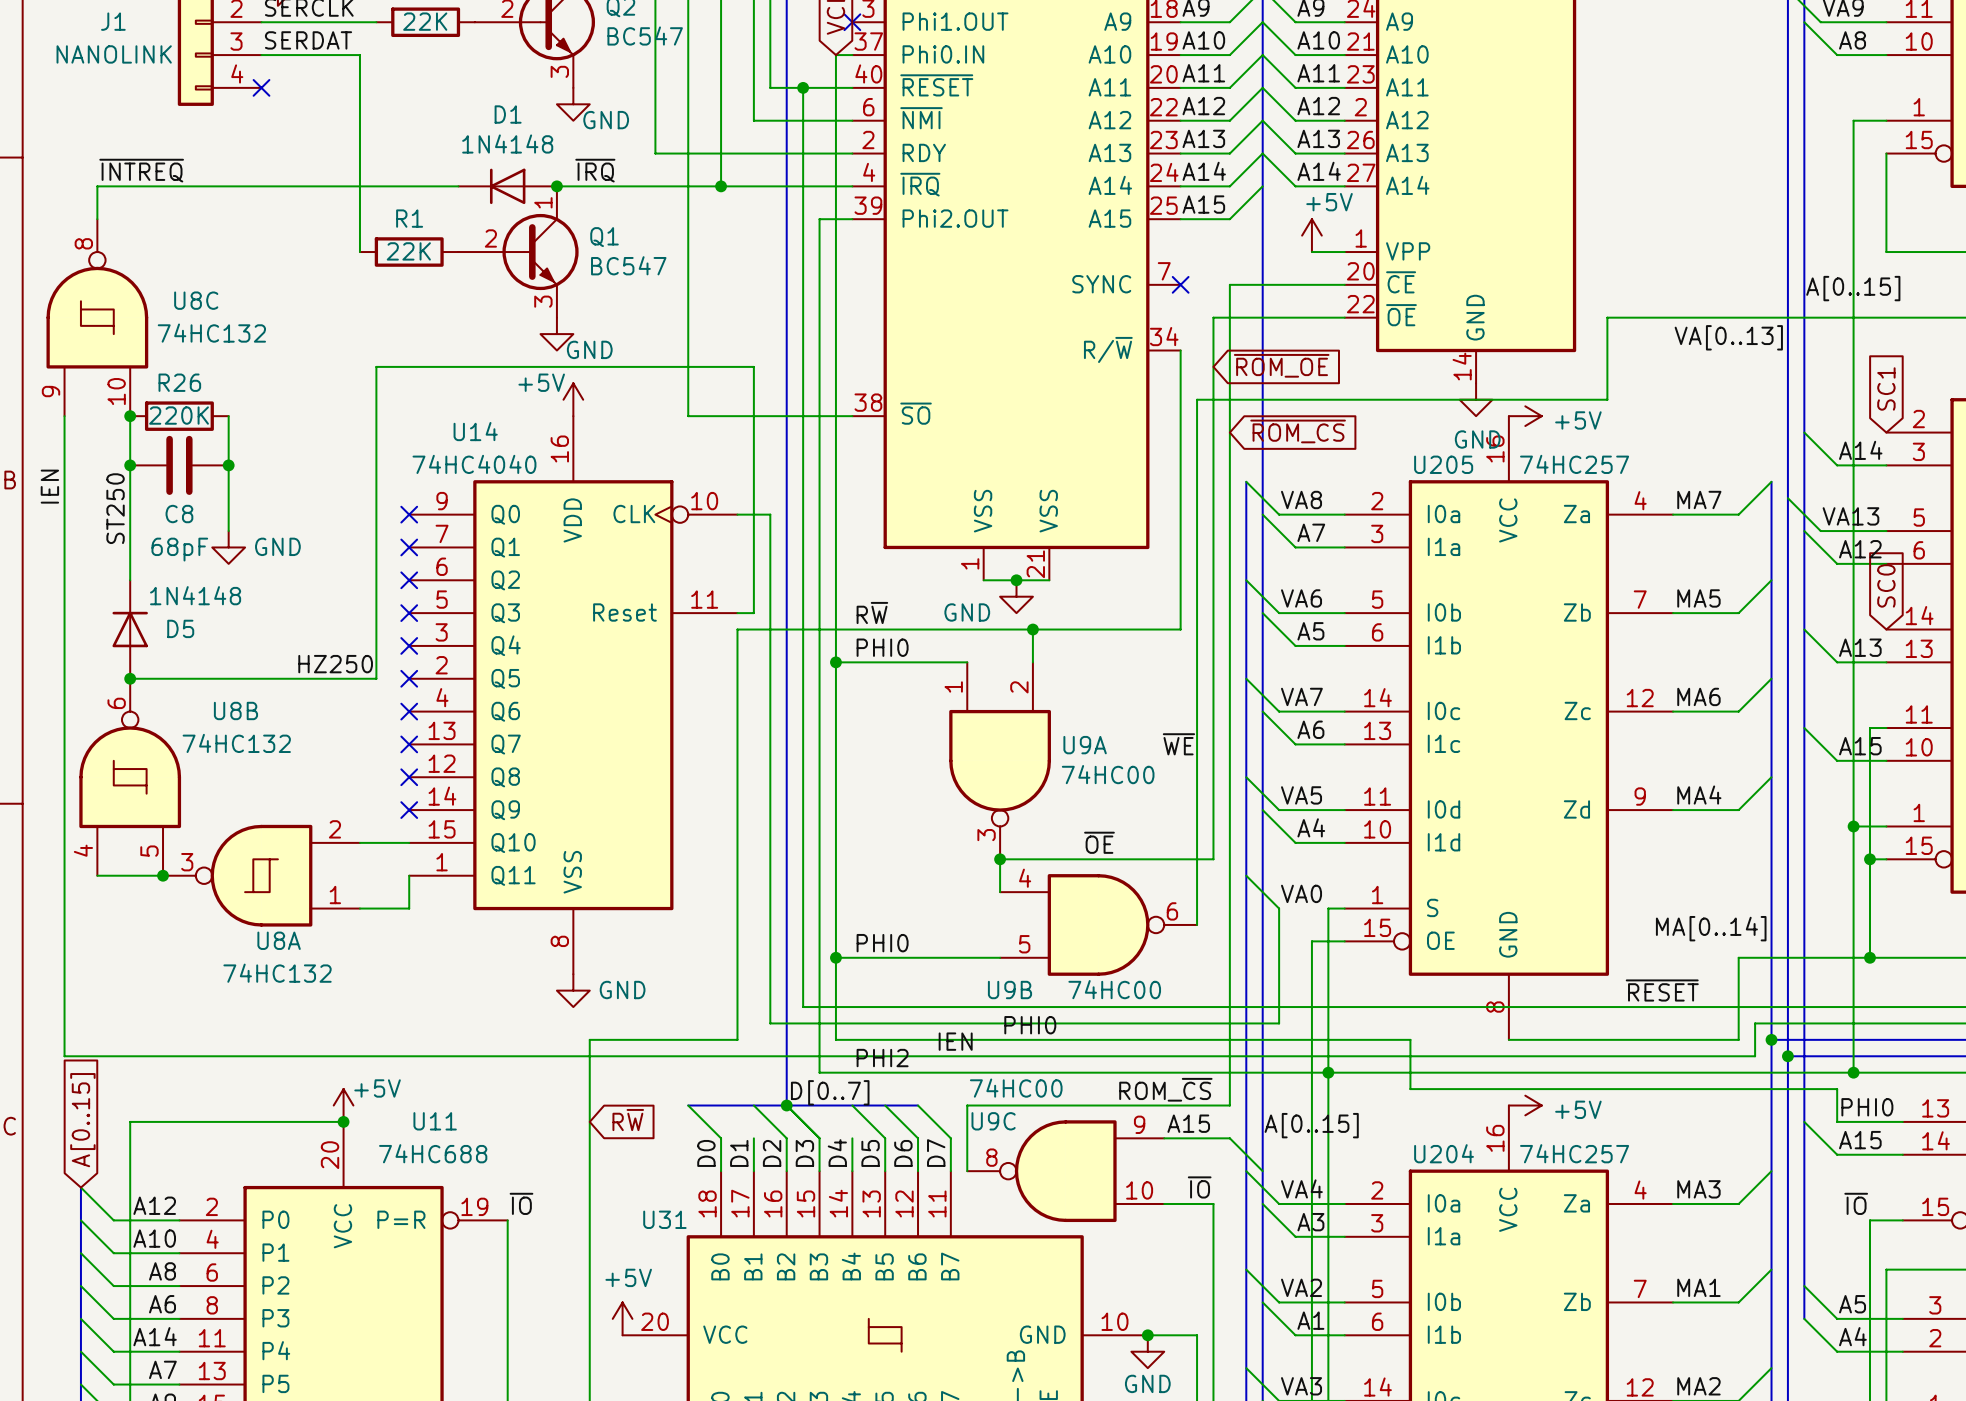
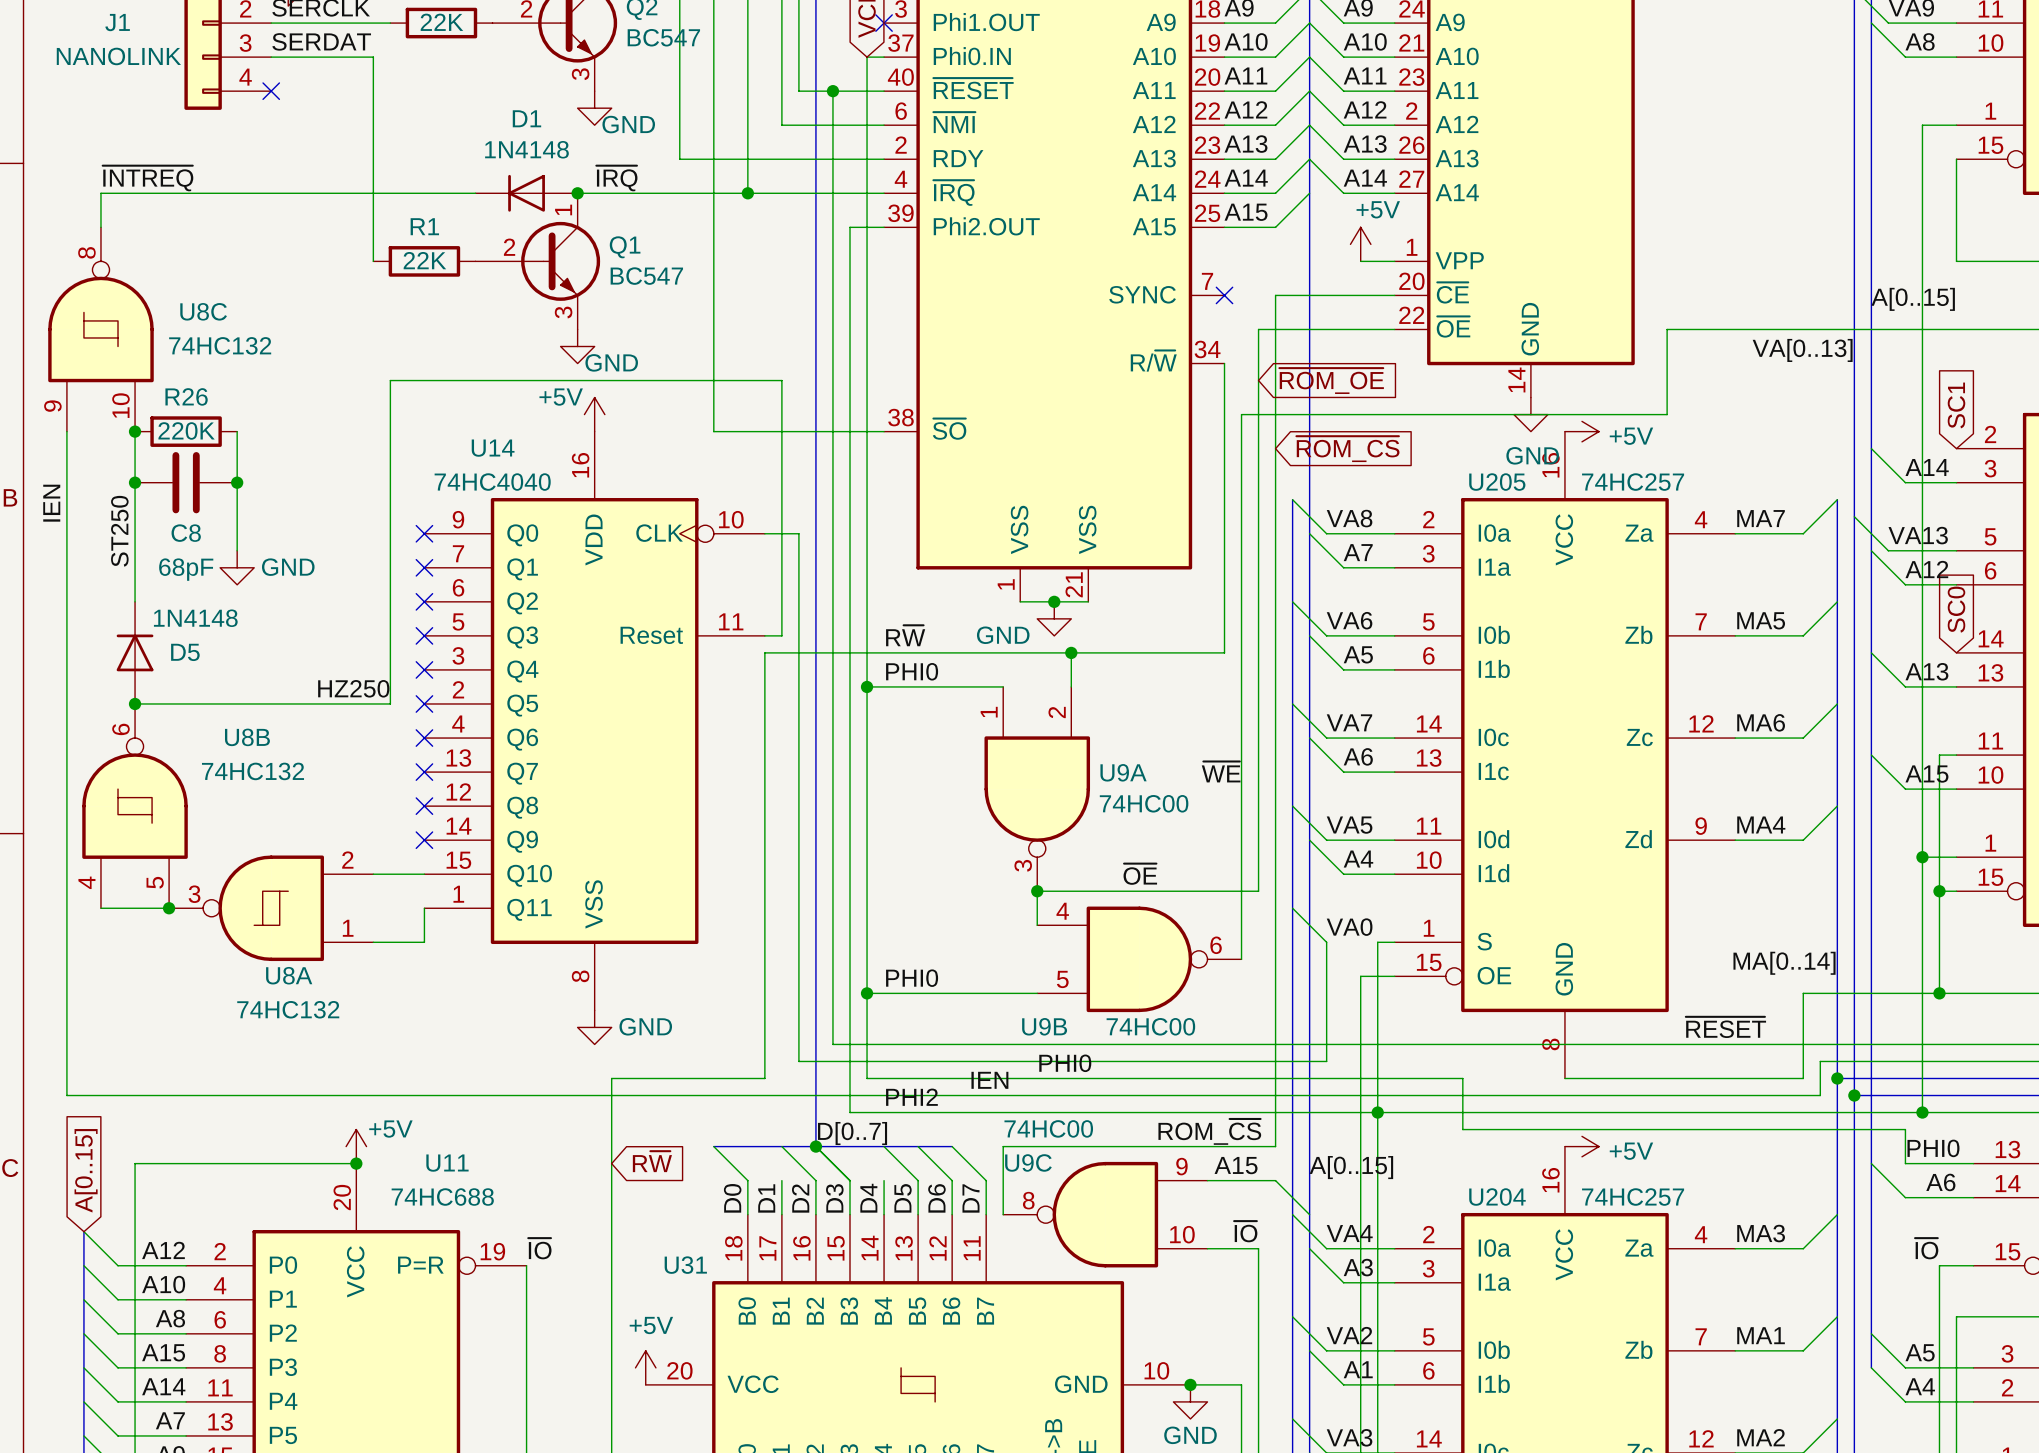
label: A15 (1860, 1140) -> none
label: none -> A6 (1940, 1182)
label: A6 (162, 1304) -> A15 (163, 1352)

